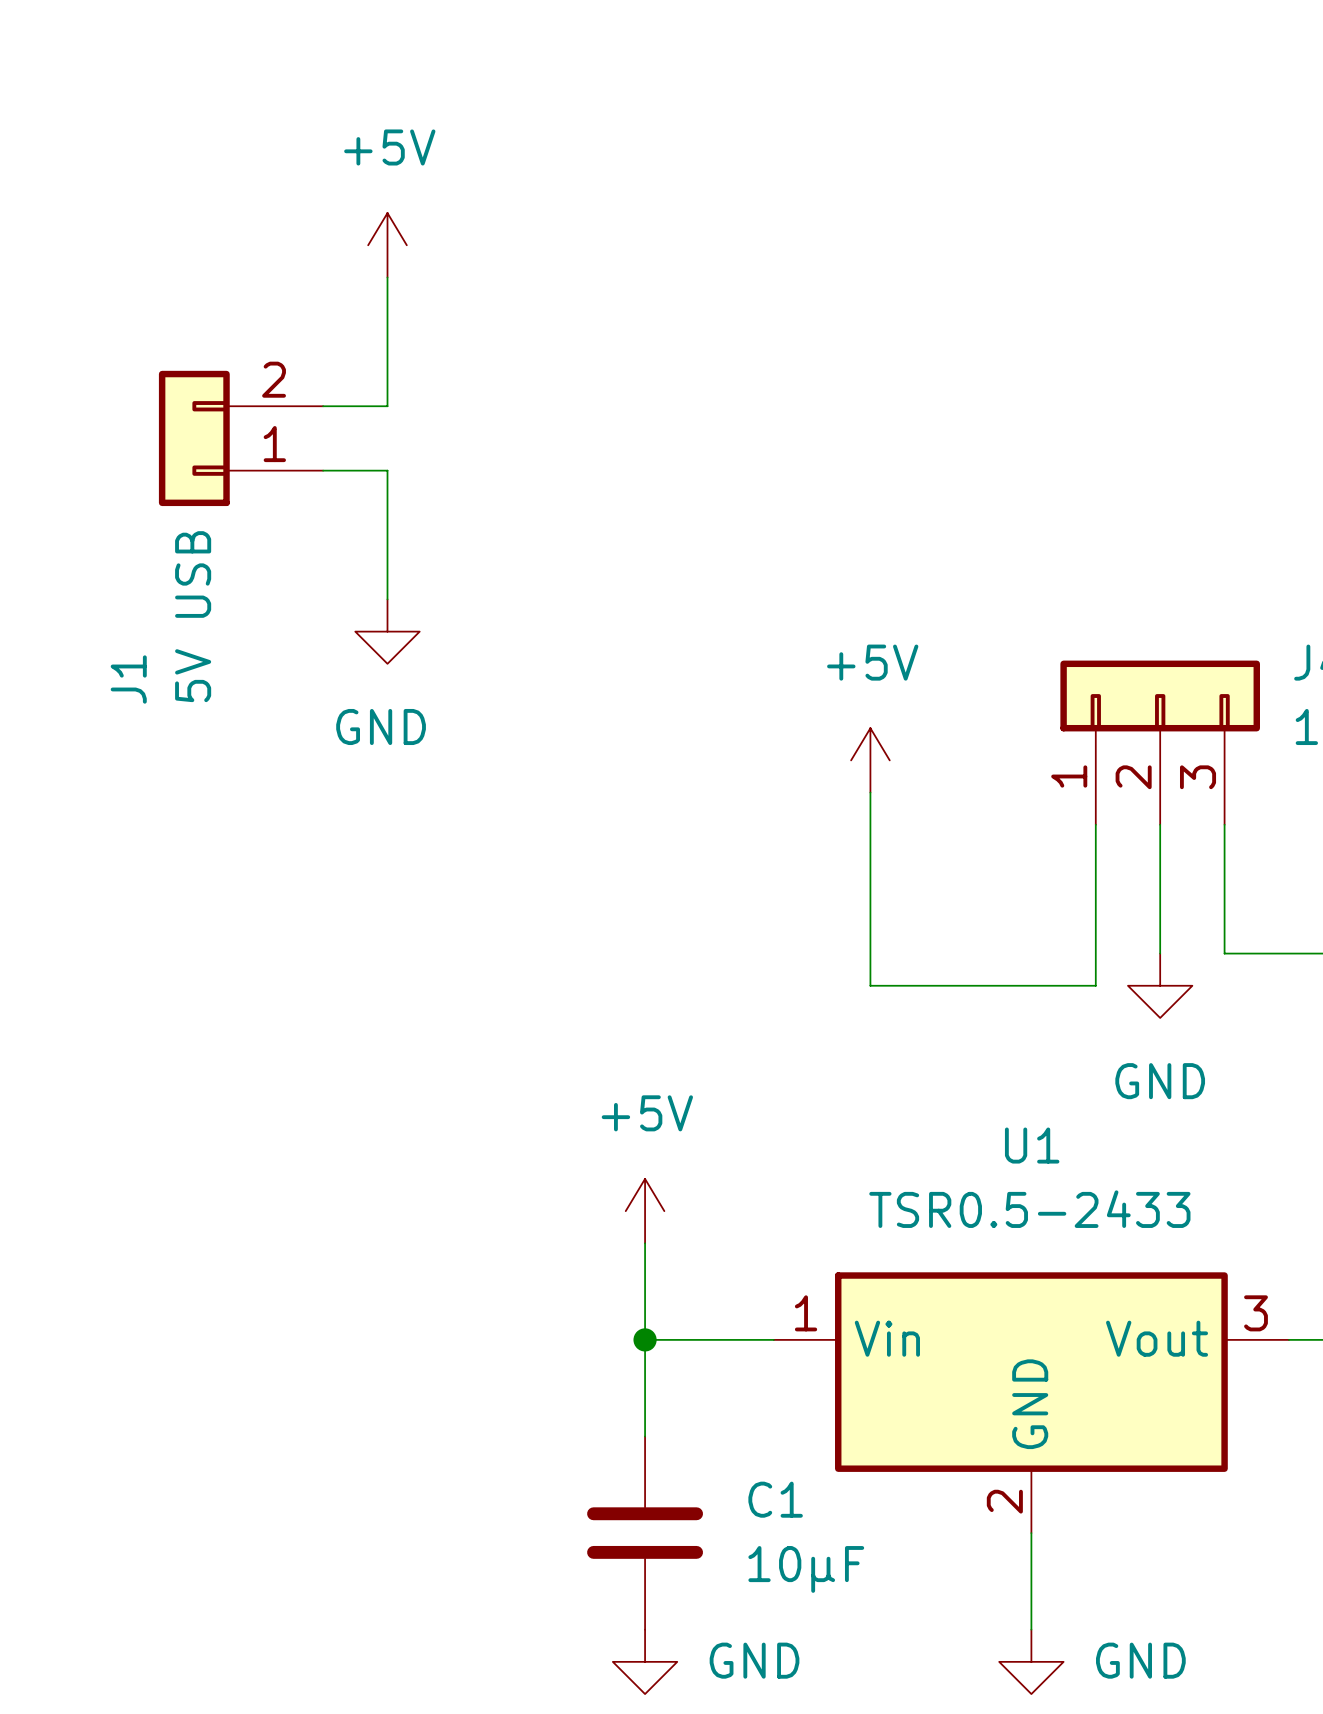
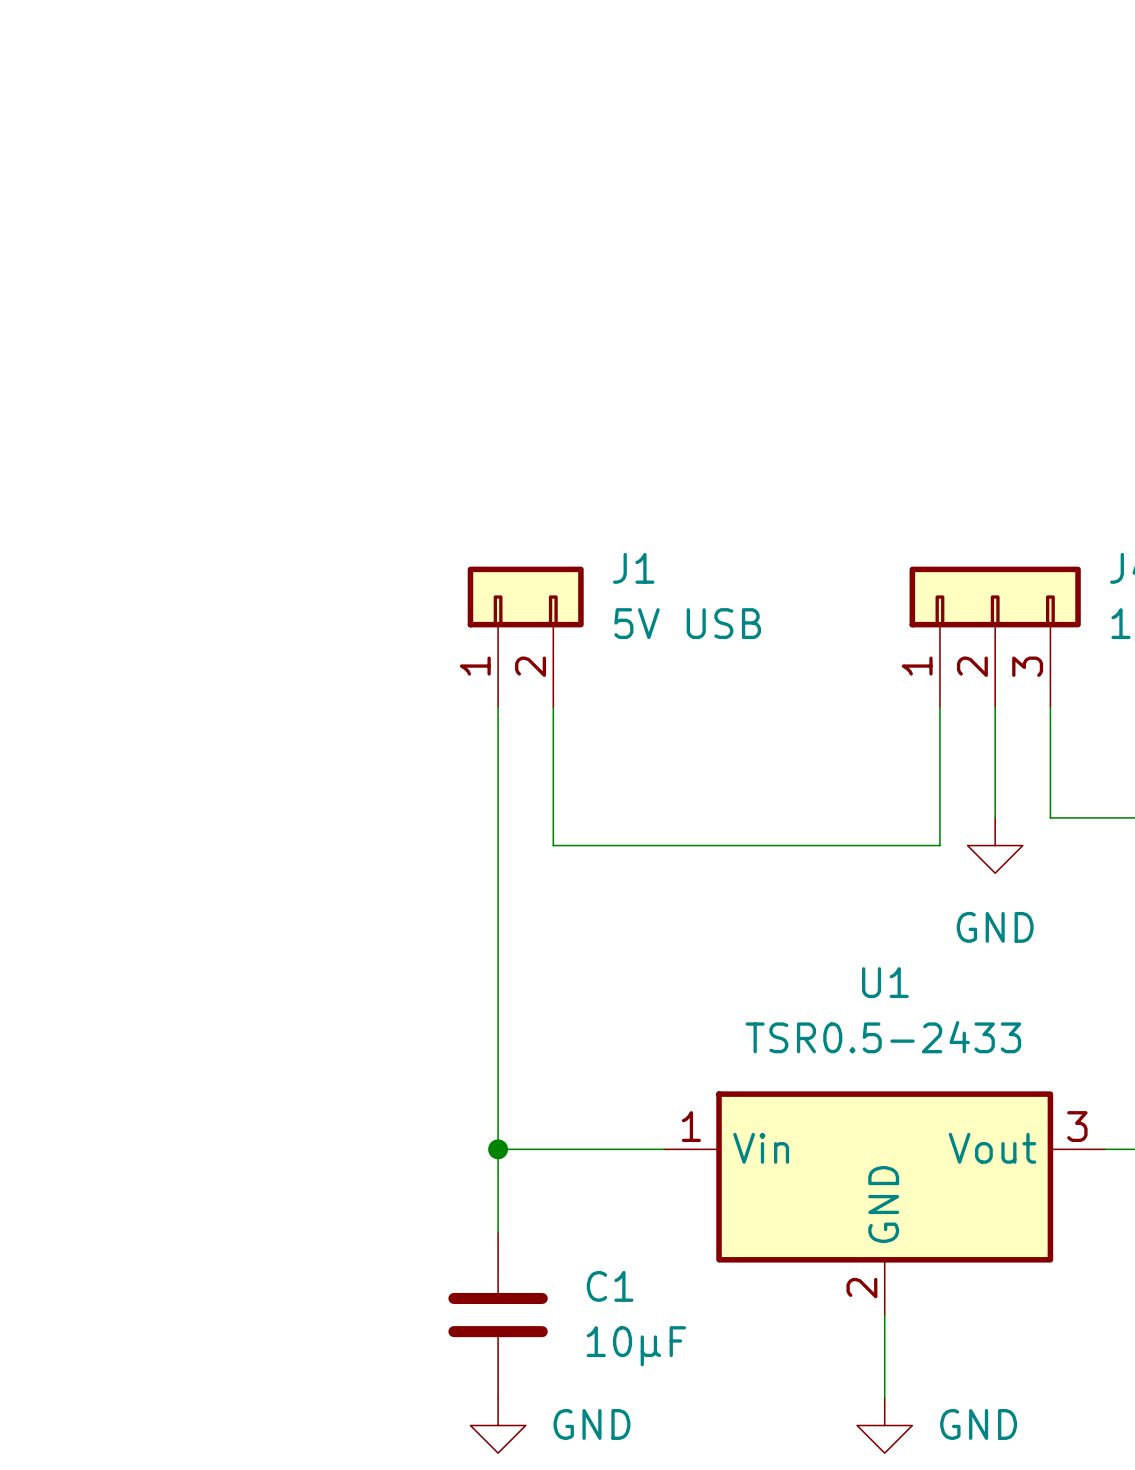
power symbol: +5V (387, 245) -> none
wire: (387, 277) (387, 406) (323, 406) -> none
J1 rotation: 0° (194, 438) -> 90° clockwise (525, 597)
J1 position: (241, 438) -> (525, 637)
wire: (323, 470) (387, 470) (387, 599) -> none
J1 value position: 5V USB (193, 616) -> 5V USB (687, 623)
power symbol: GND (387, 631) -> none
J1 name position: J1 (128, 679) -> J1 (633, 568)
power symbol: +5V (870, 760) -> none
wire: (870, 792) (870, 985) -> (553, 707) (553, 845) (746, 845)
wire: none -> (498, 707) (498, 1232)
power symbol: +5V (645, 1211) -> none
wire: (645, 1243) (645, 1436) -> none
wire: none -> (498, 1149) (553, 1149)
junction position: (645, 1339) -> (498, 1149)
C1 position: (645, 1533) -> (498, 1315)
power symbol position: GND (645, 1661) -> GND (498, 1425)

